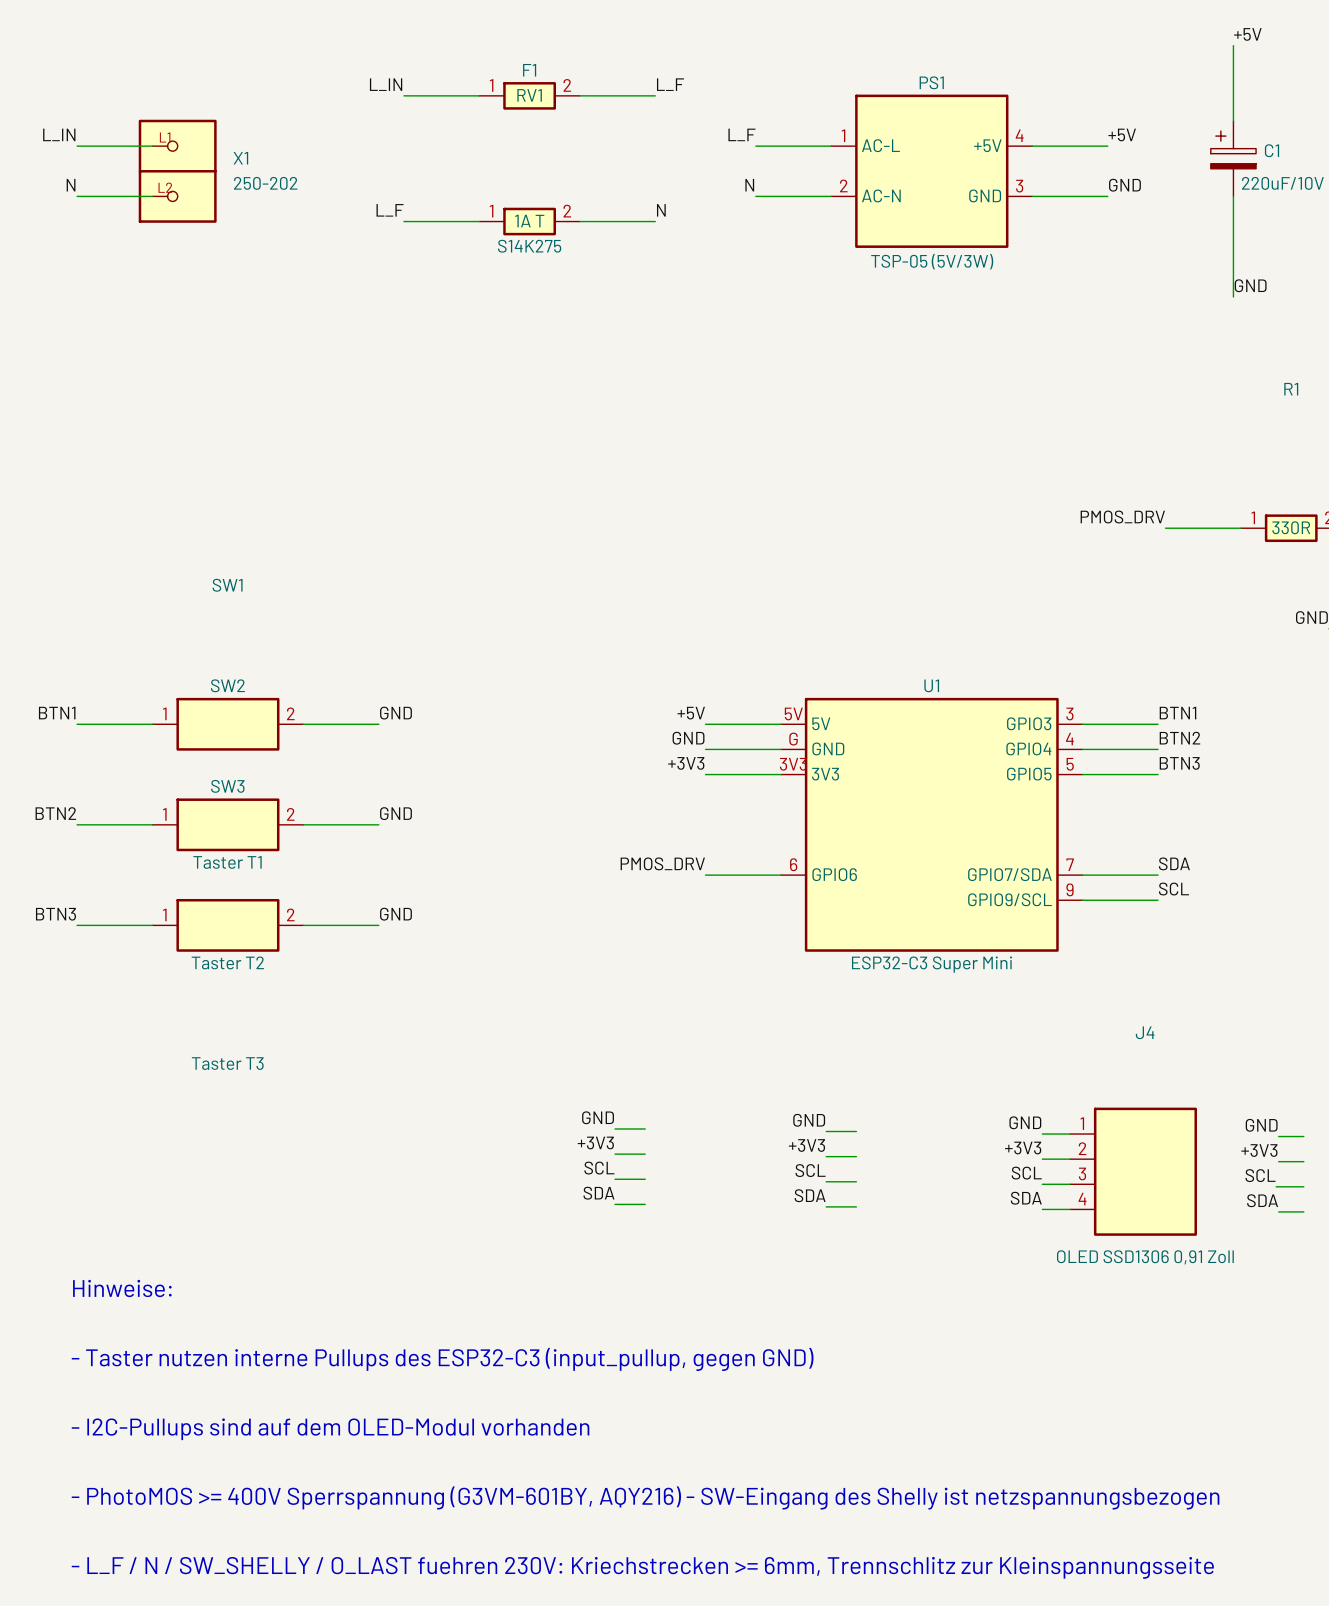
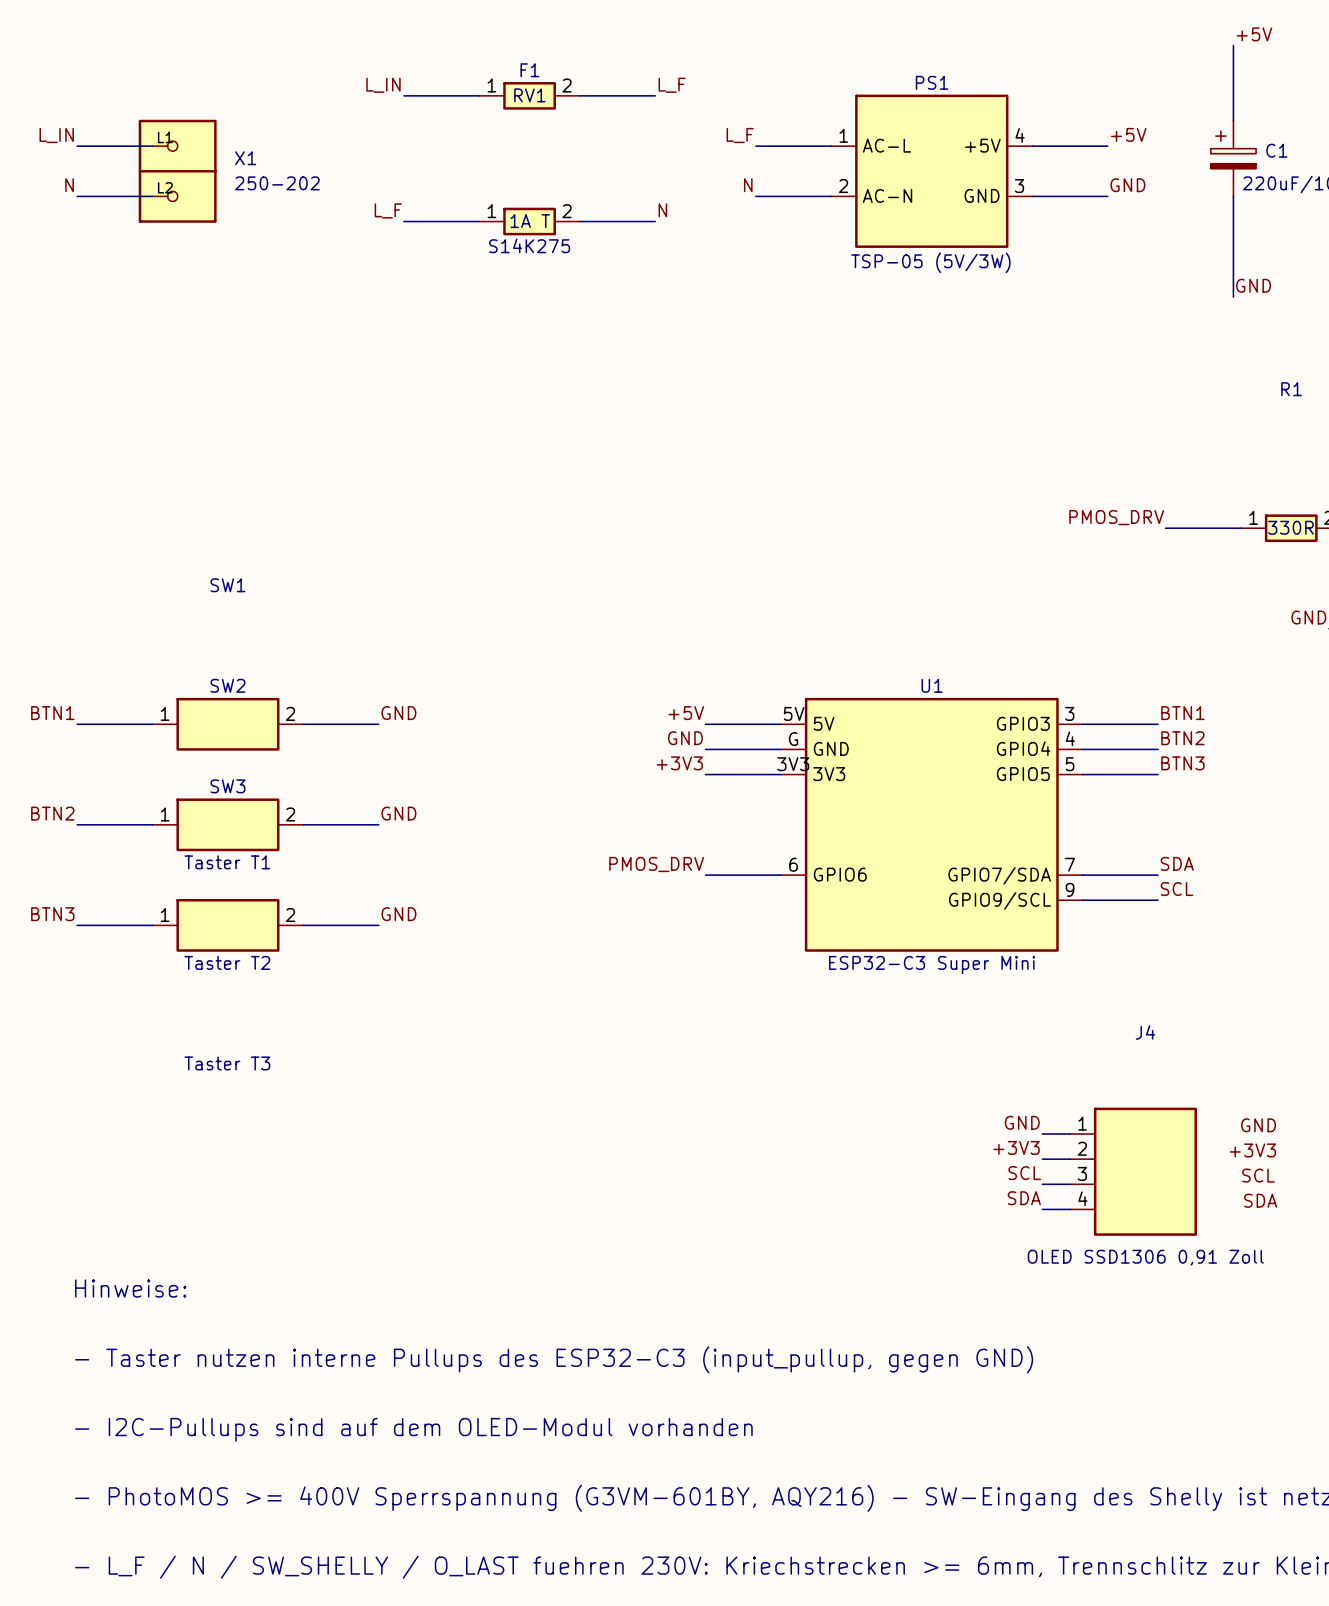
label: GND (598, 1117) -> none
label: GND (809, 1120) -> none
wire: (615, 1128) (645, 1128) -> none
wire: (826, 1131) (856, 1131) -> none
wire: (1278, 1136) (1303, 1136) -> none
label: +3V3 (595, 1142) -> none
label: +3V3 (806, 1145) -> none
wire: (615, 1154) (645, 1154) -> none
wire: (826, 1156) (856, 1156) -> none
wire: (1278, 1161) (1303, 1161) -> none
label: SCL (599, 1168) -> none
label: SCL (810, 1170) -> none
wire: (615, 1179) (645, 1179) -> none
wire: (826, 1181) (856, 1181) -> none
wire: (1276, 1186) (1303, 1186) -> none
label: SDA (598, 1193) -> none
label: SDA (810, 1195) -> none
wire: (615, 1204) (645, 1204) -> none
wire: (826, 1206) (856, 1206) -> none
wire: (1278, 1211) (1303, 1211) -> none

